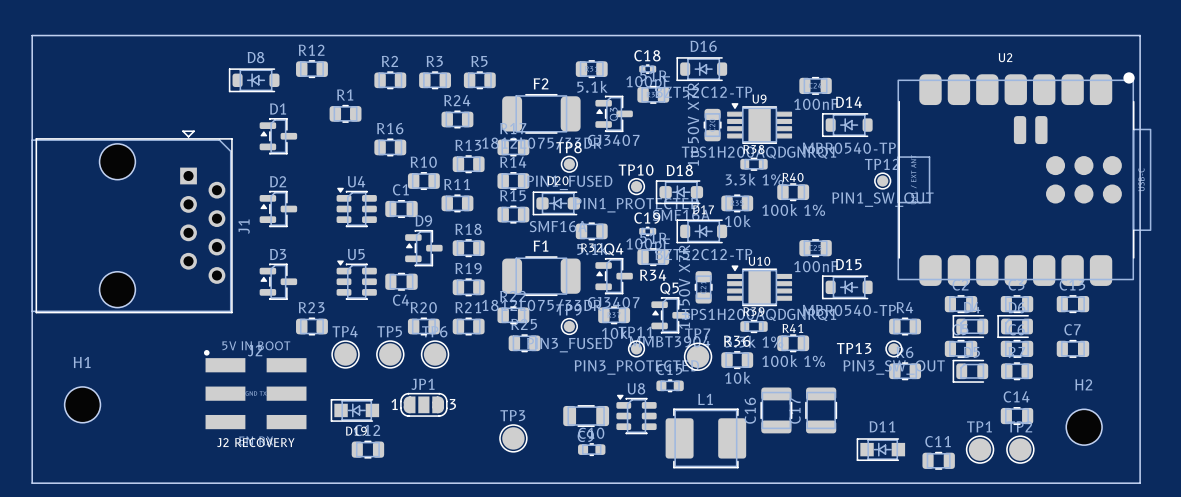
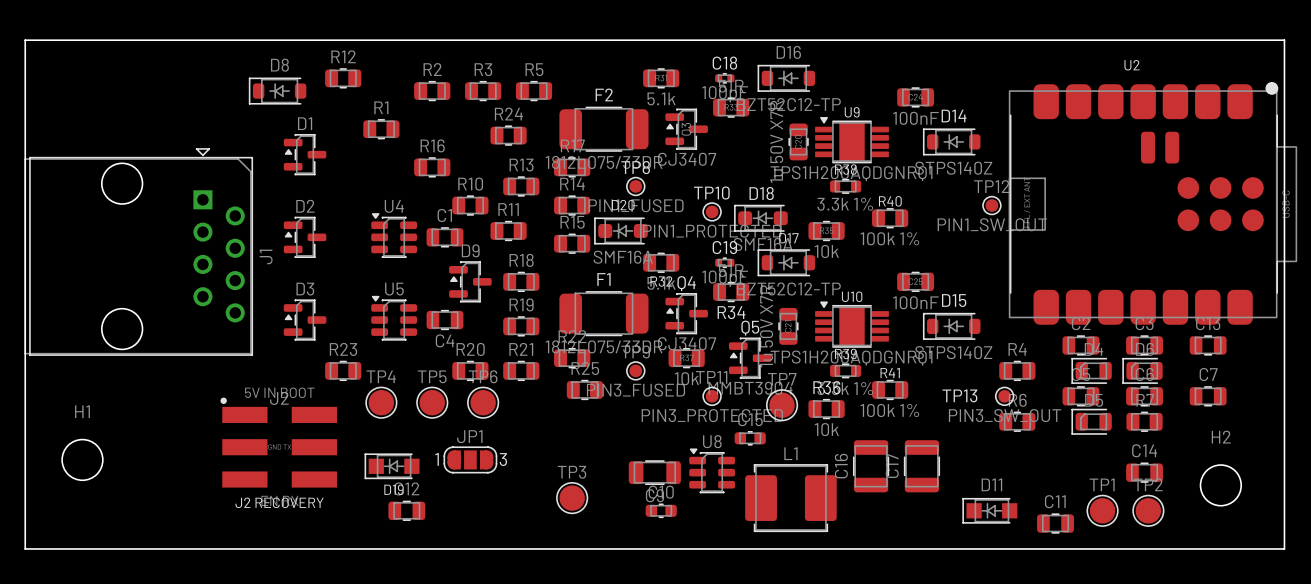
D14 value: MBR0540-TP (849, 148) -> STPS140Z (953, 168)
D15 value: MBR0540-TP (849, 310) -> STPS140Z (953, 352)

